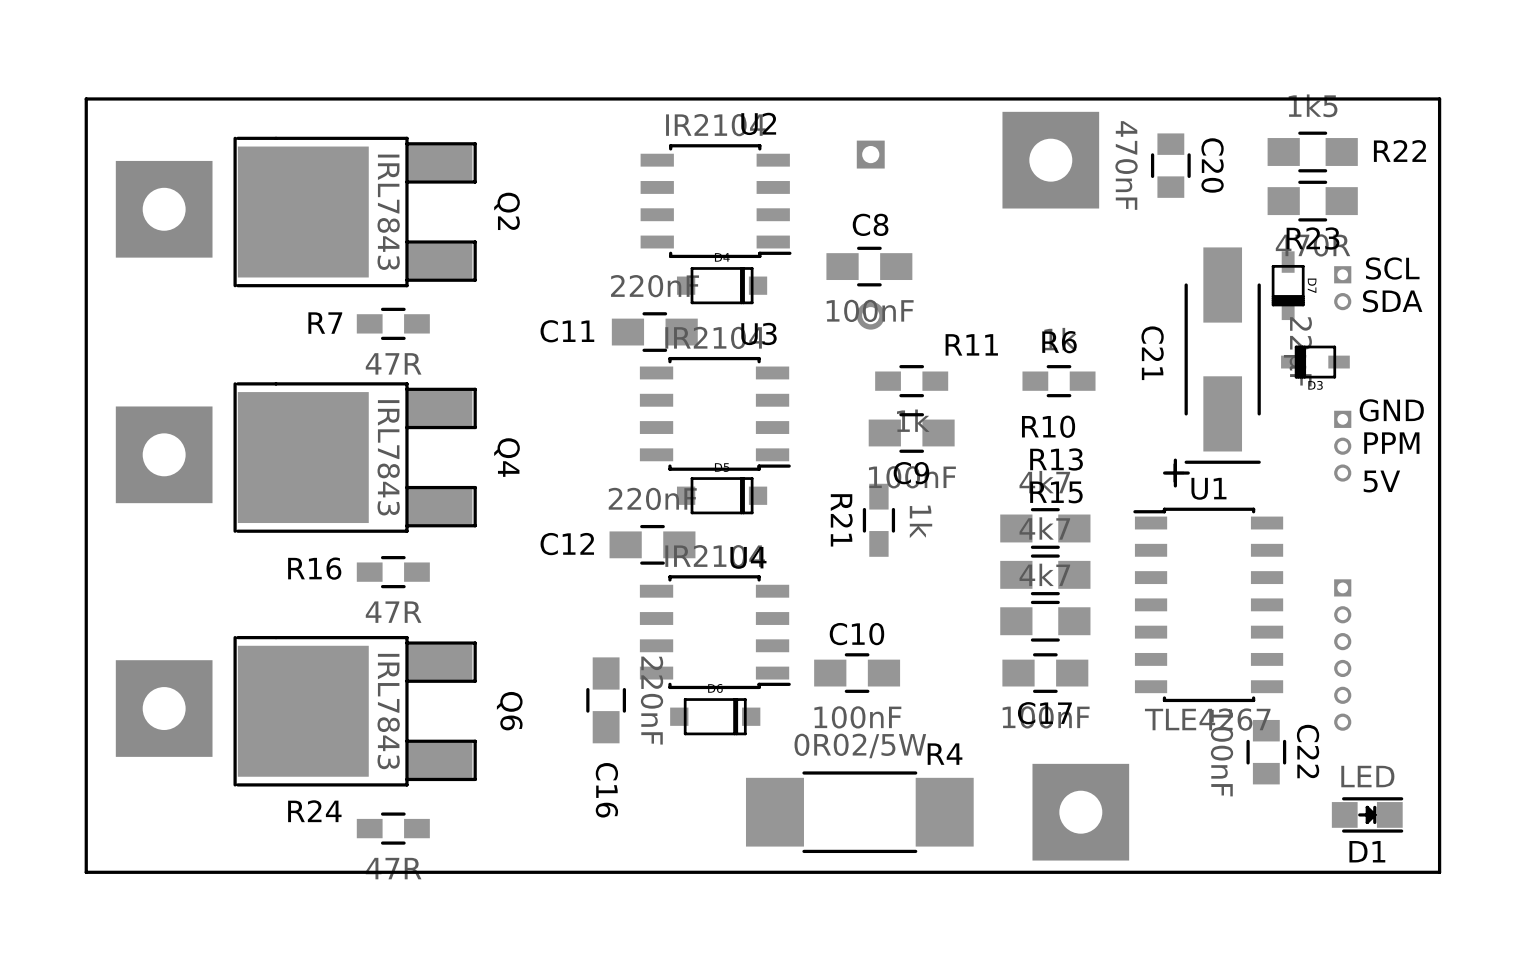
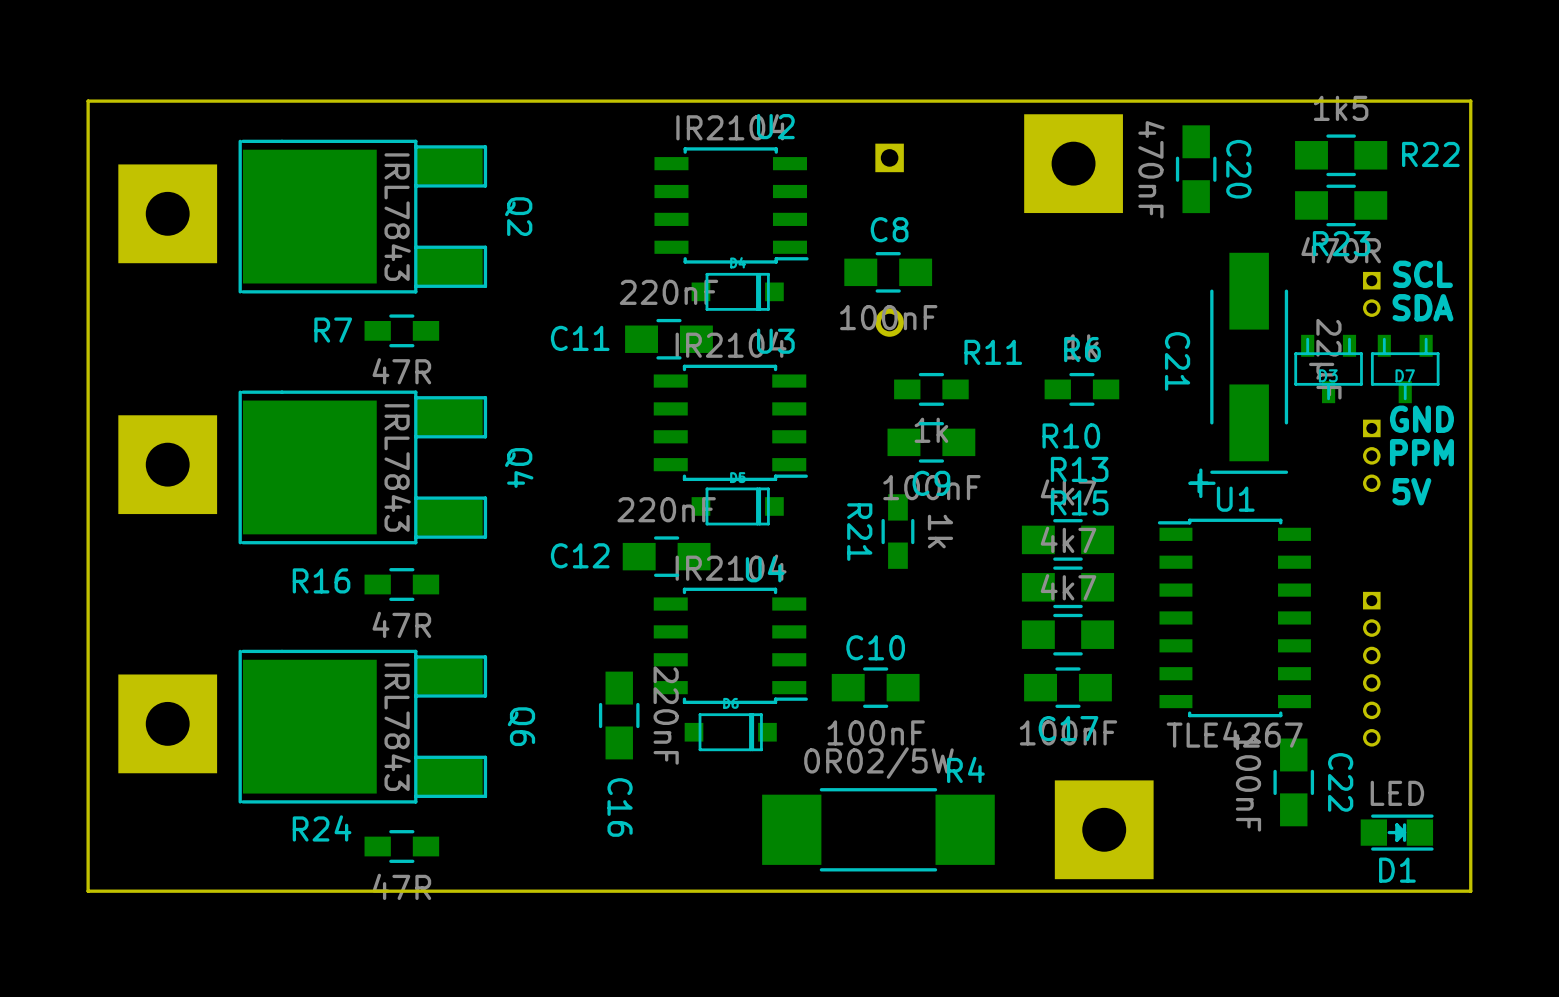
C20 footprint: [1150, 133, 1191, 198] -> [1175, 125, 1217, 214]
D7 footprint: [1271, 251, 1305, 321] -> [1370, 334, 1440, 404]
D3 footprint: [1281, 345, 1350, 379] -> [1294, 334, 1363, 404]
C22 footprint: [1246, 719, 1287, 785] -> [1273, 738, 1315, 827]

